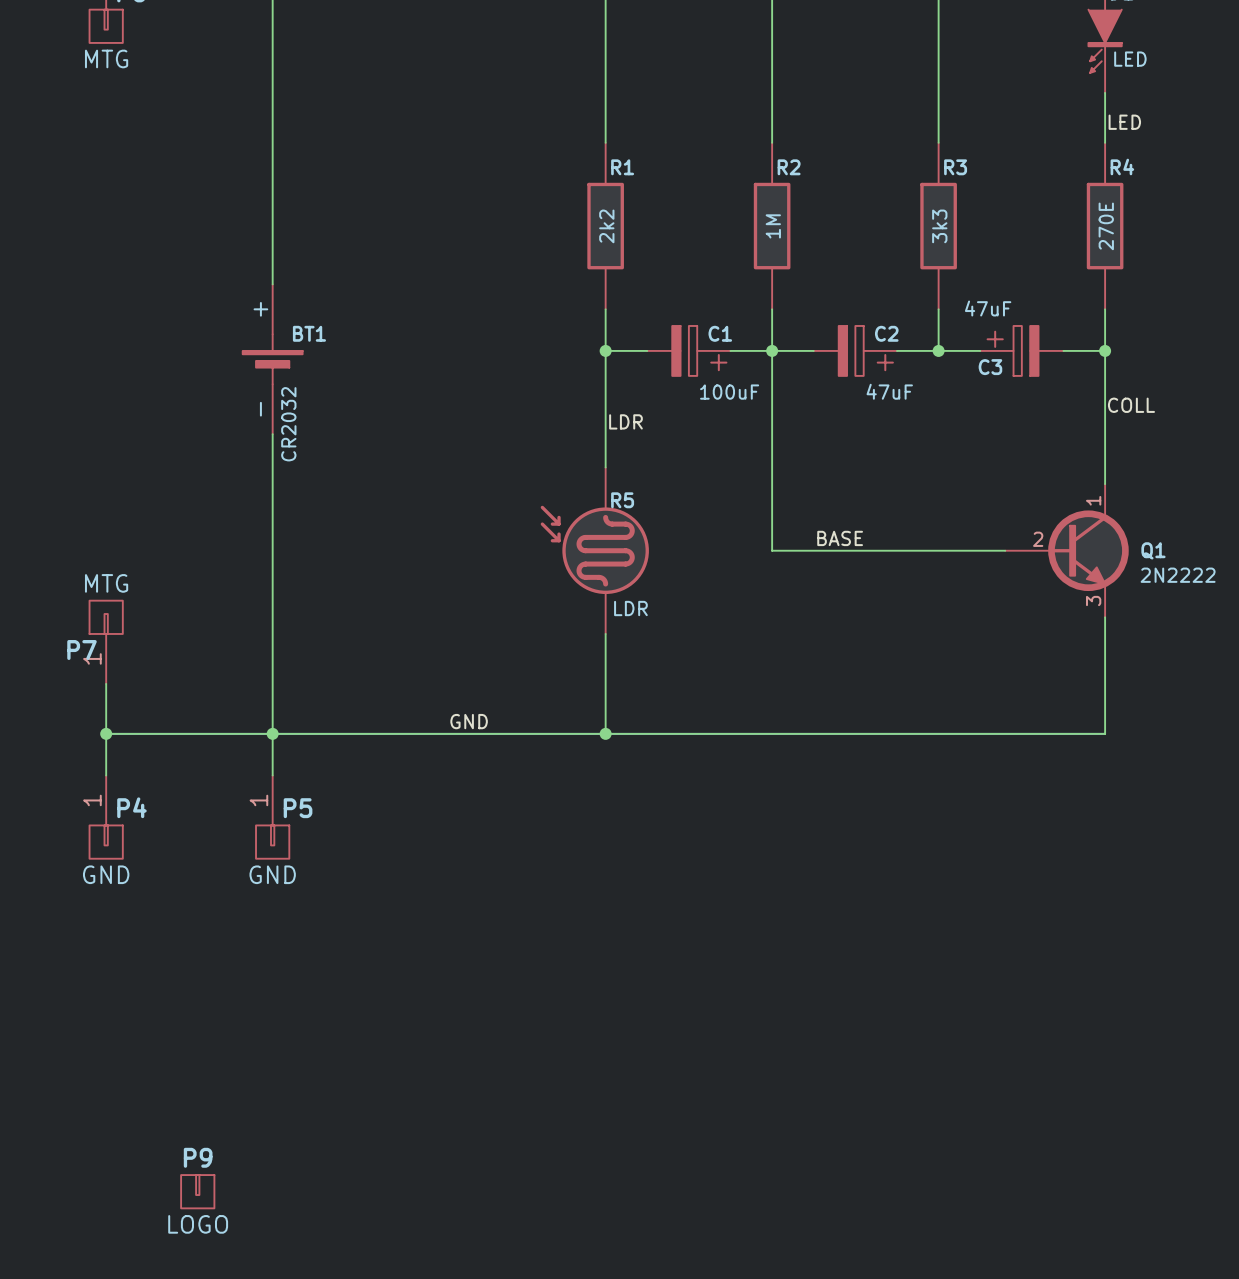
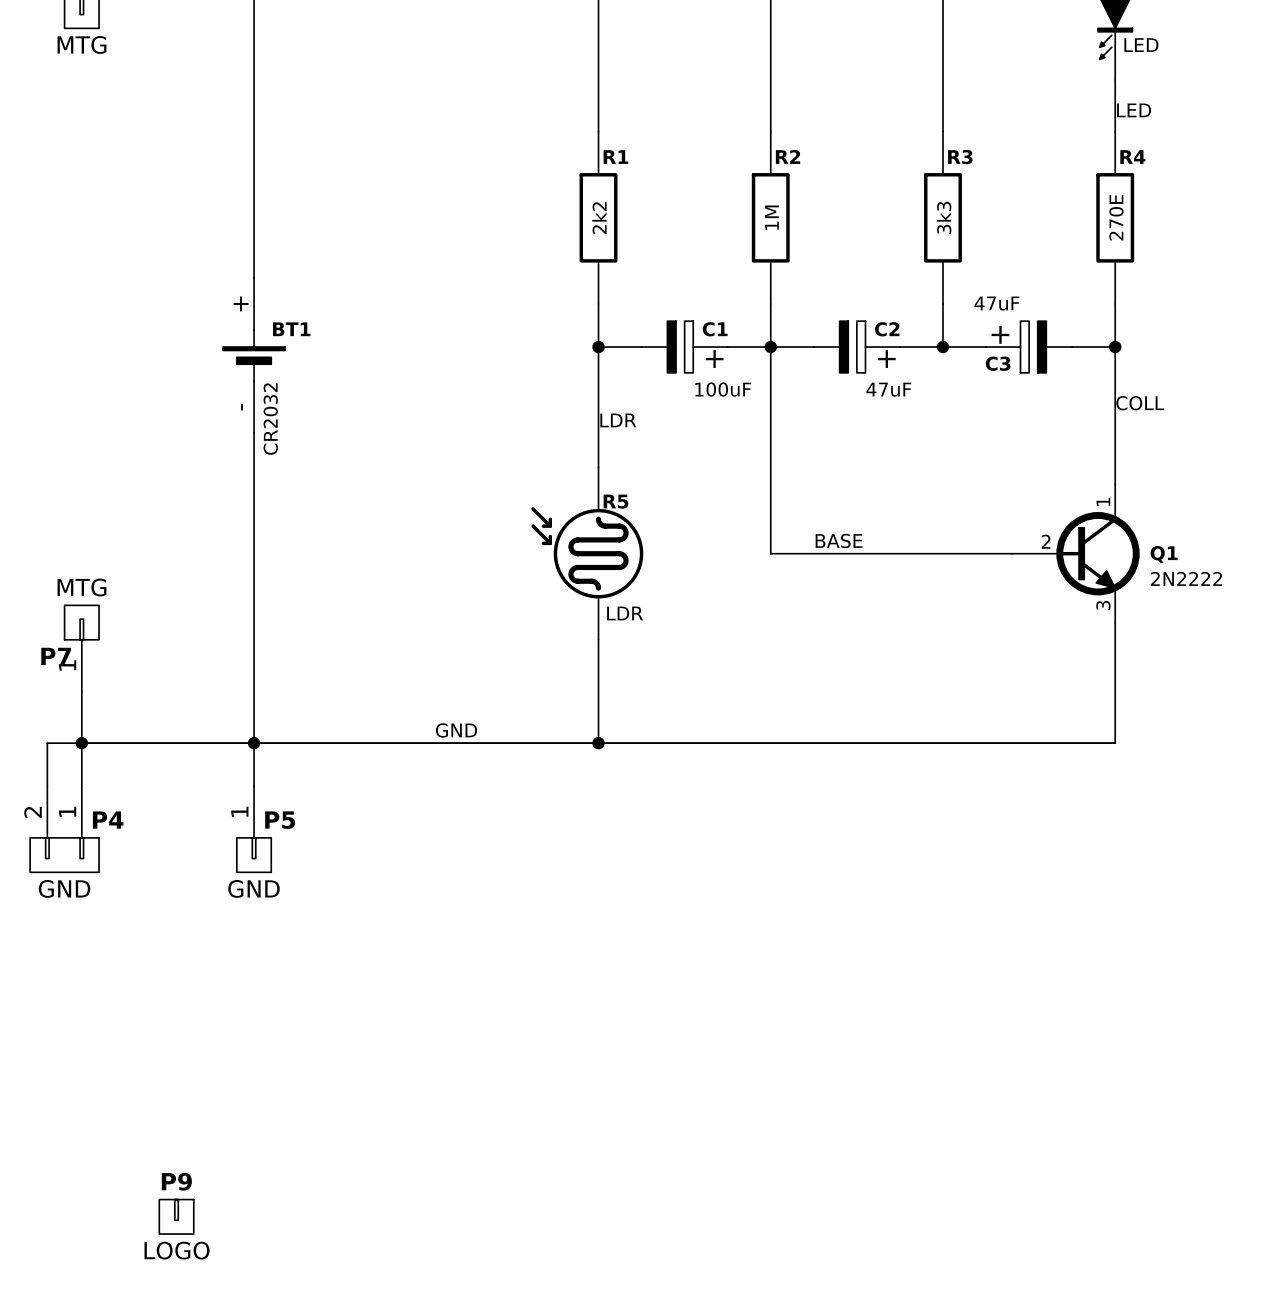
wire: none -> (81, 743) (47, 743) (47, 786)
P4 symbol: [89, 775, 123, 859] -> [30, 786, 100, 873]

